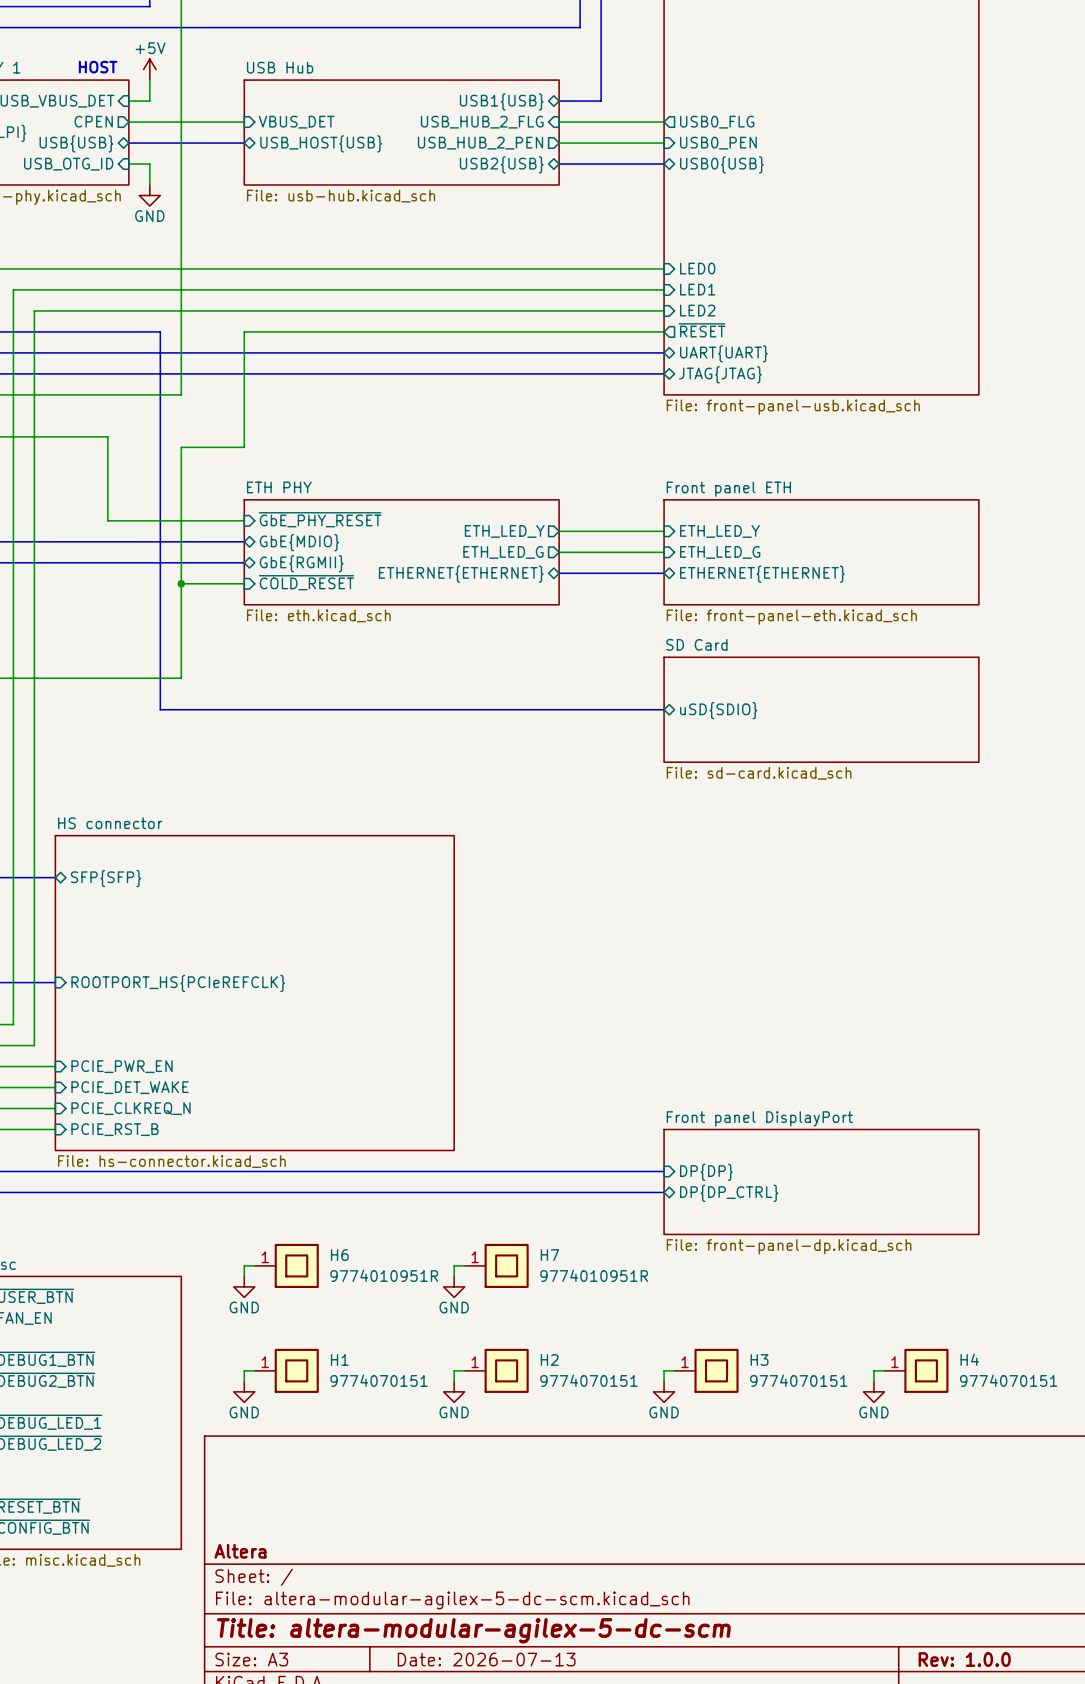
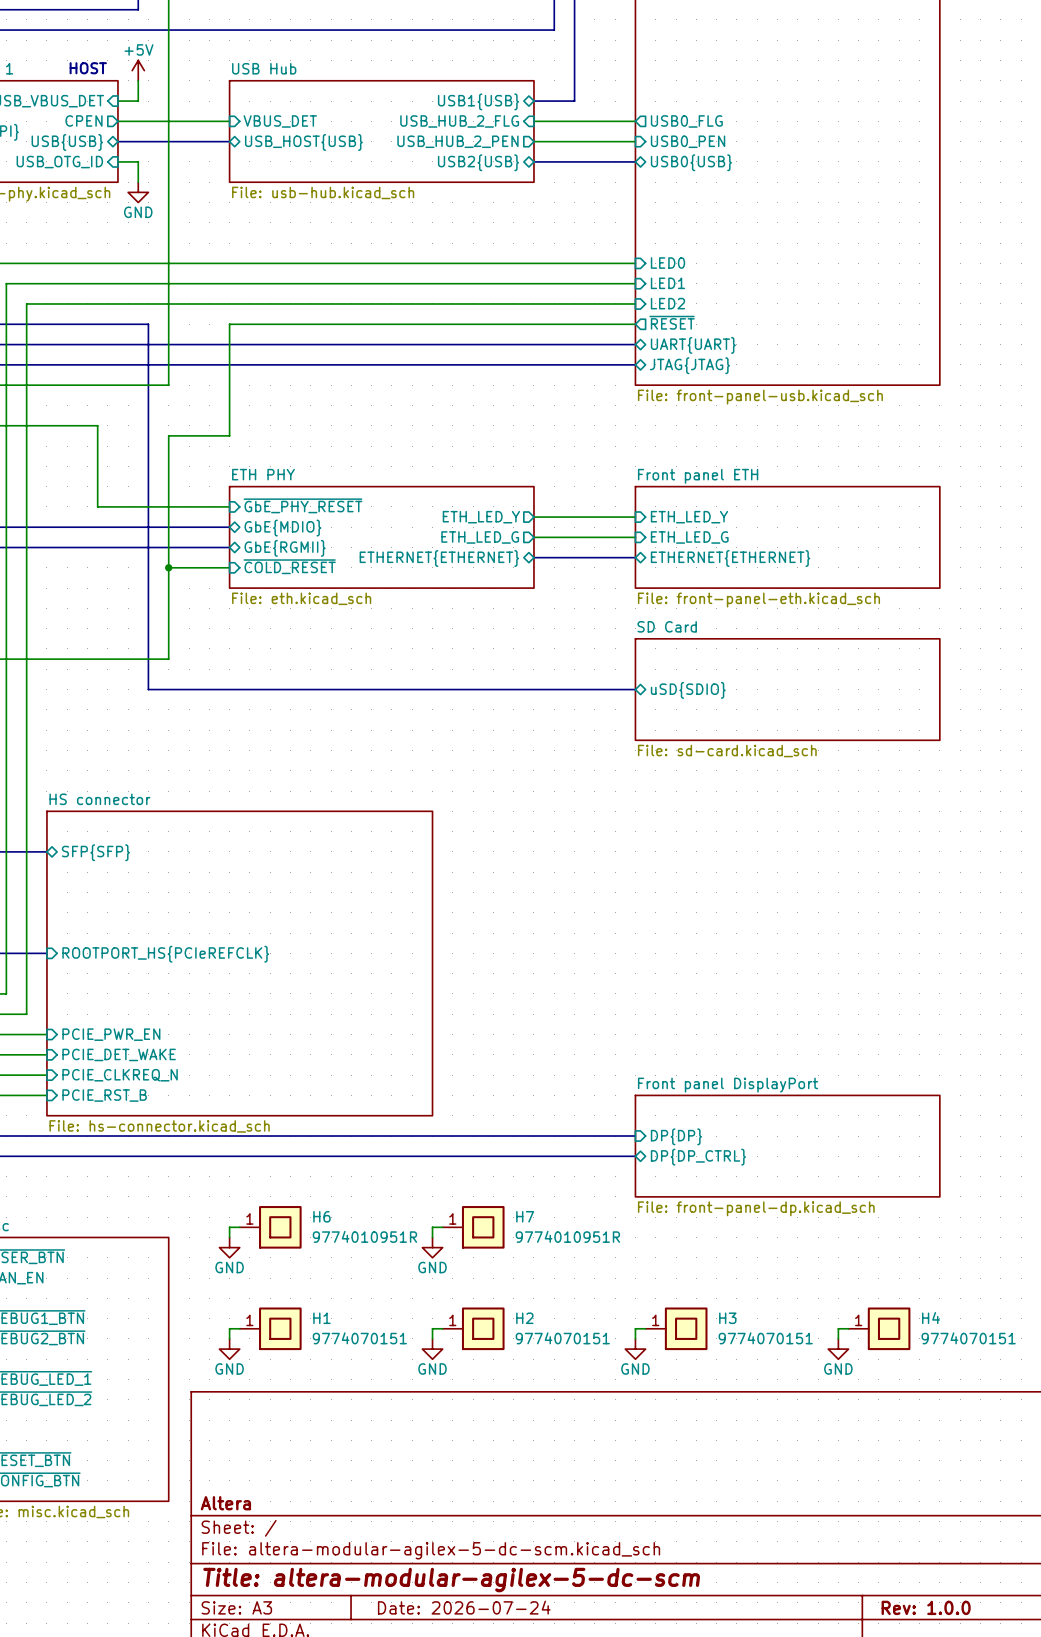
title block: Date: 2026-07-13 (486, 1659) -> Date: 2026-07-24 (464, 1607)

